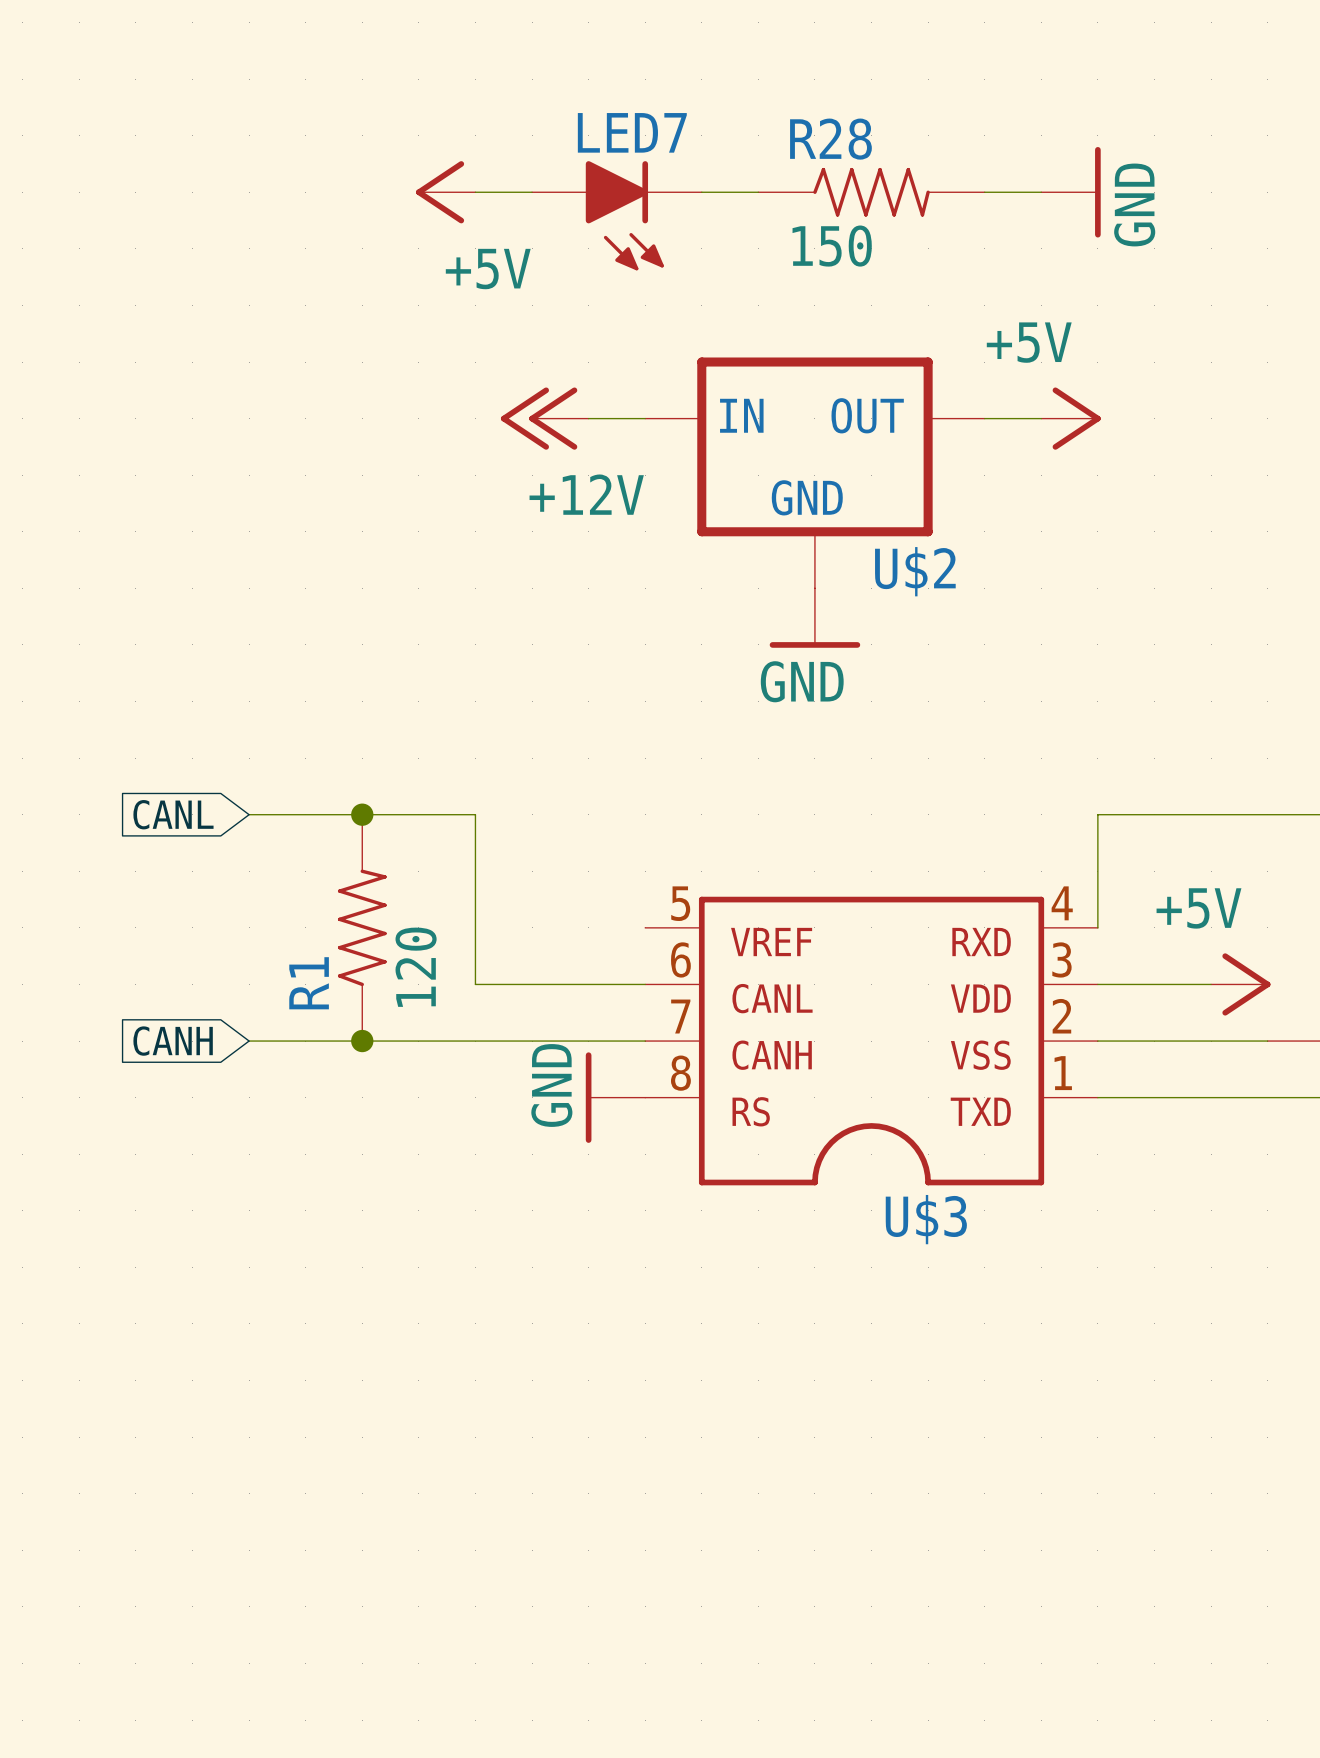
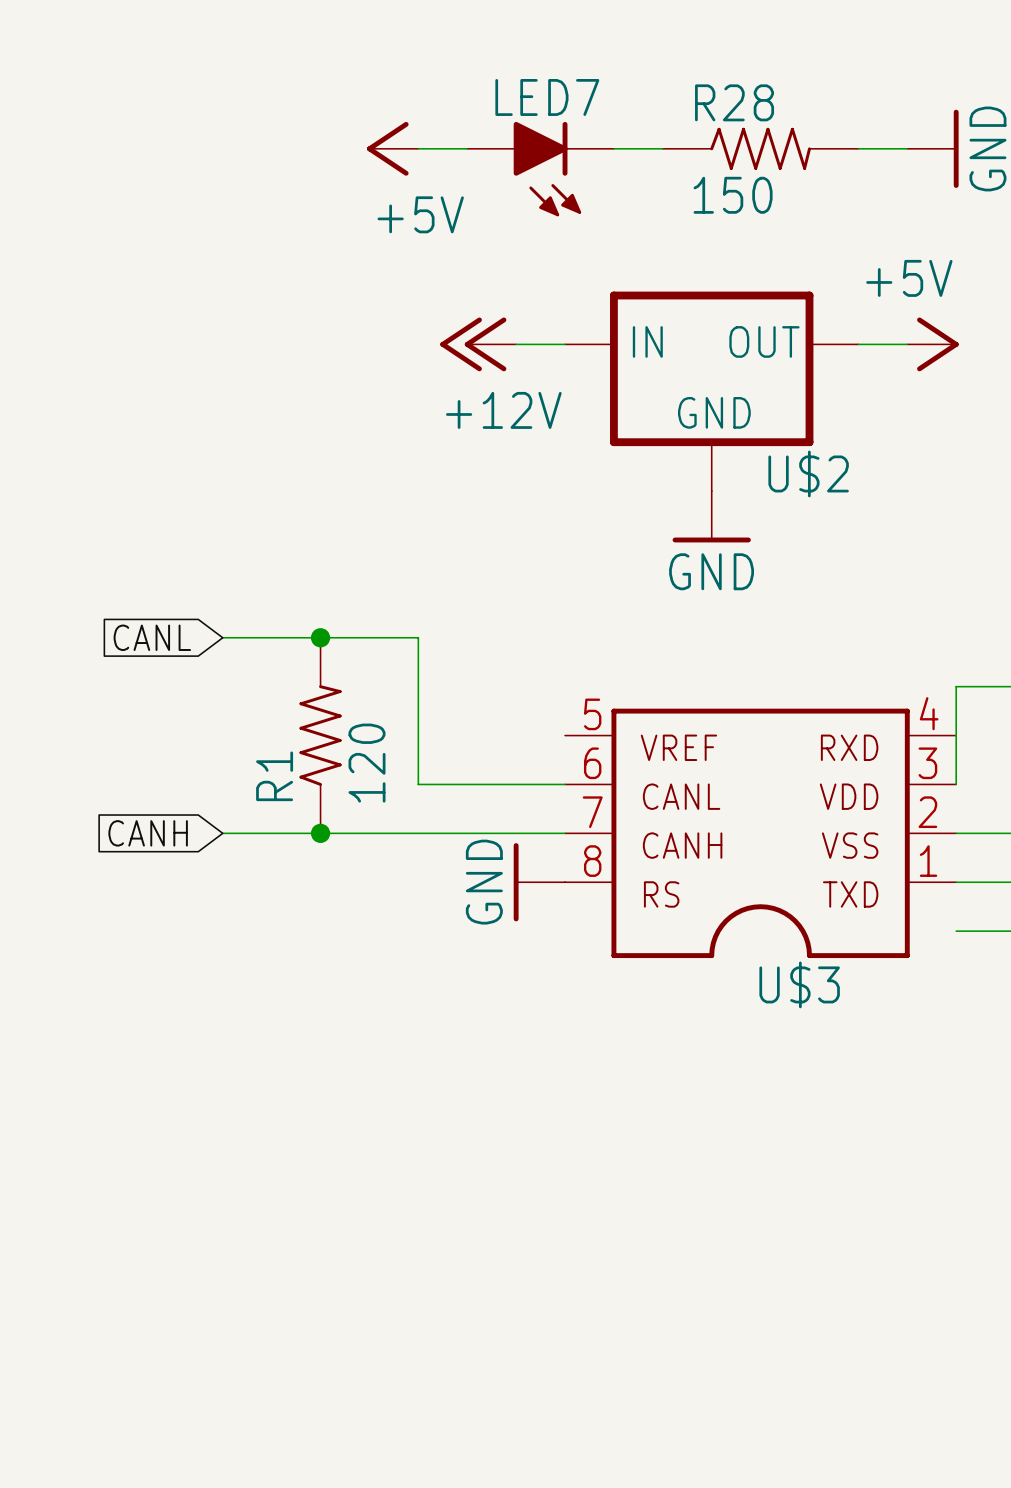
global label position: CANL (173, 814) -> CANL (152, 637)
wire: (249, 814) (475, 814) -> (222, 637) (418, 637) (418, 686)
junction position: (362, 814) -> (320, 637)
R1 position: (362, 927) -> (320, 735)
wire: (475, 927) (475, 984) -> (418, 784) (565, 784)
wire: none -> (222, 833) (418, 833)
global label position: CANH (173, 1041) -> CANH (148, 833)
wire: (249, 1041) (645, 1041) -> none
junction position: (362, 1041) -> (320, 833)
U$3 position: (871, 1041) -> (760, 833)
power symbol position: GND (615, 1097) -> GND (539, 882)

